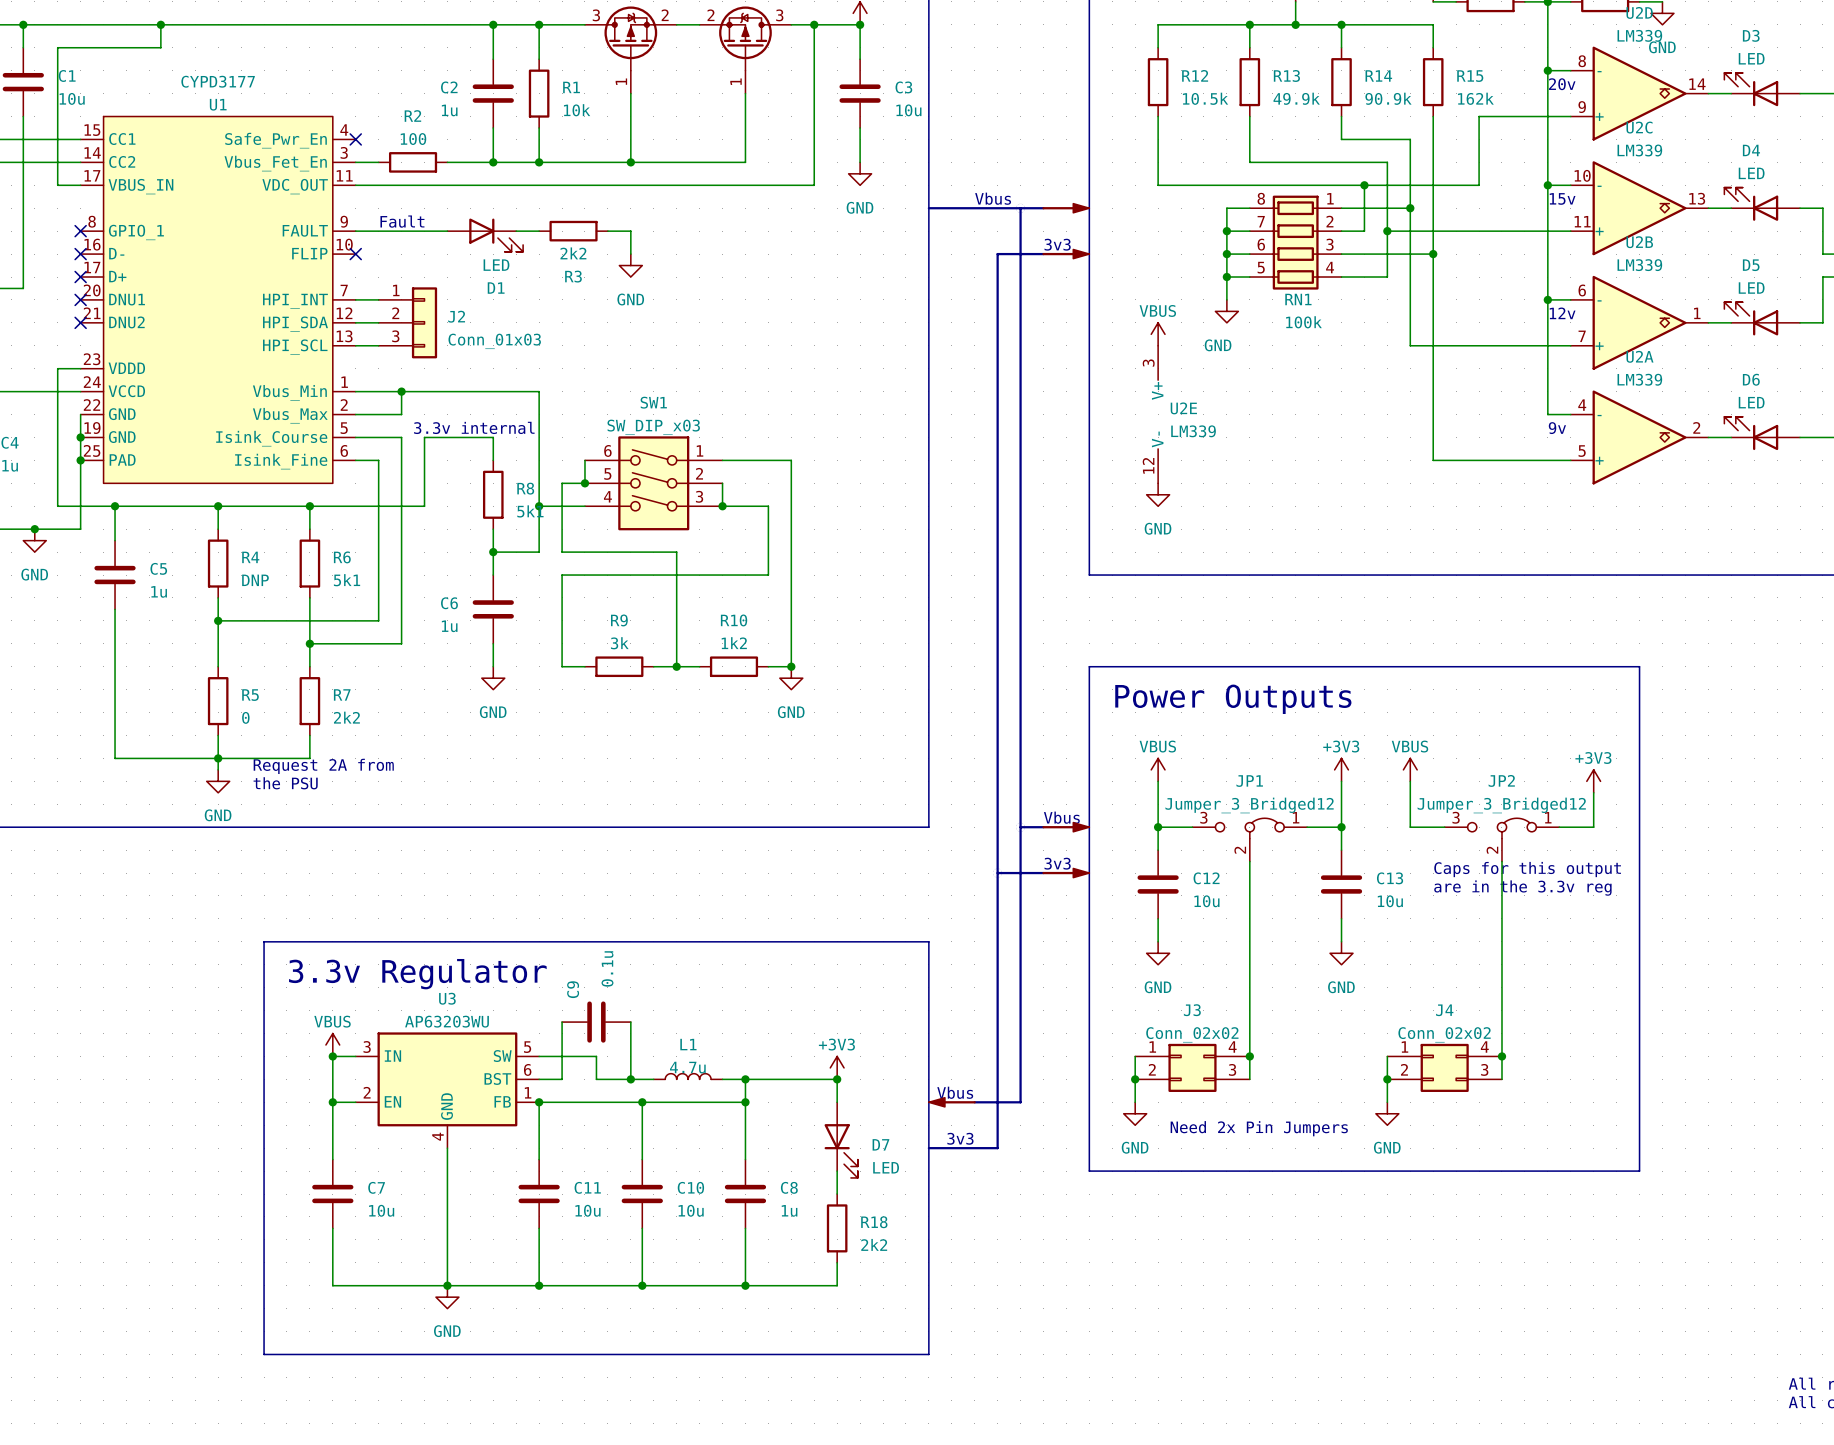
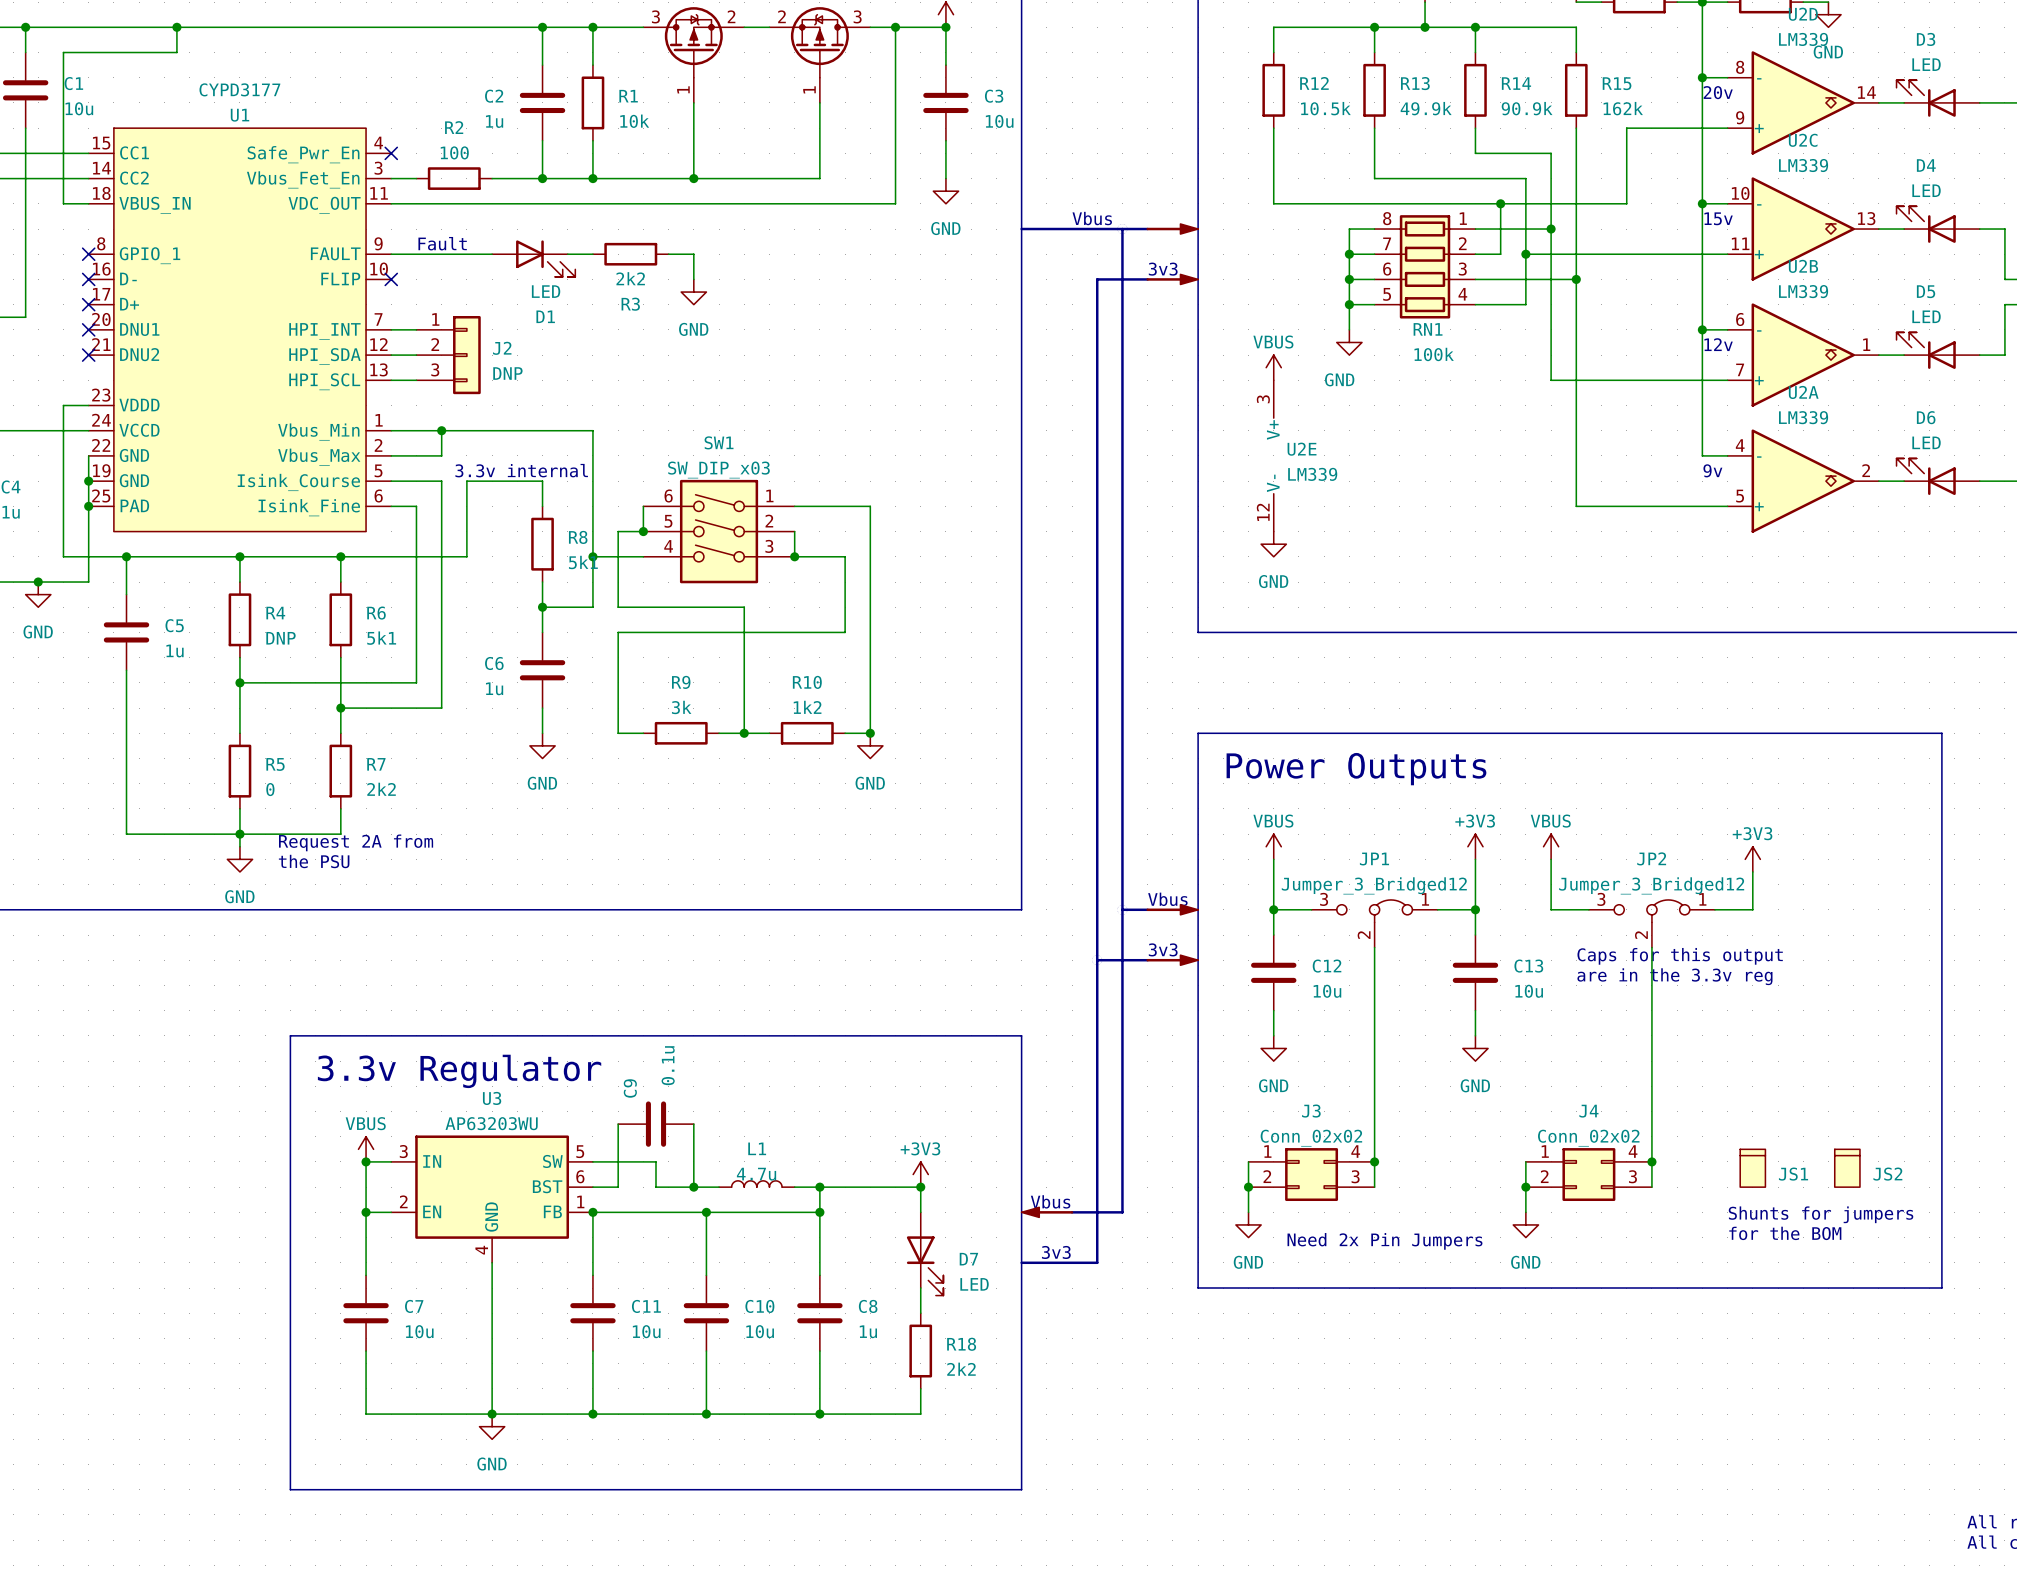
U1 pin number: 17 (92, 175) -> 18 (101, 193)
J2 value: Conn_01x03 (494, 341) -> DNP (507, 373)
line: (1639, 666) (1639, 1171) -> (1803, 733) (1941, 733) (1941, 1288) (1803, 1288)
JS1: none -> (1752, 1168)
JS2: none -> (1847, 1168)
text: none -> Shunts for jumpers (1821, 1214)
text: none -> for the BOM (1785, 1233)

